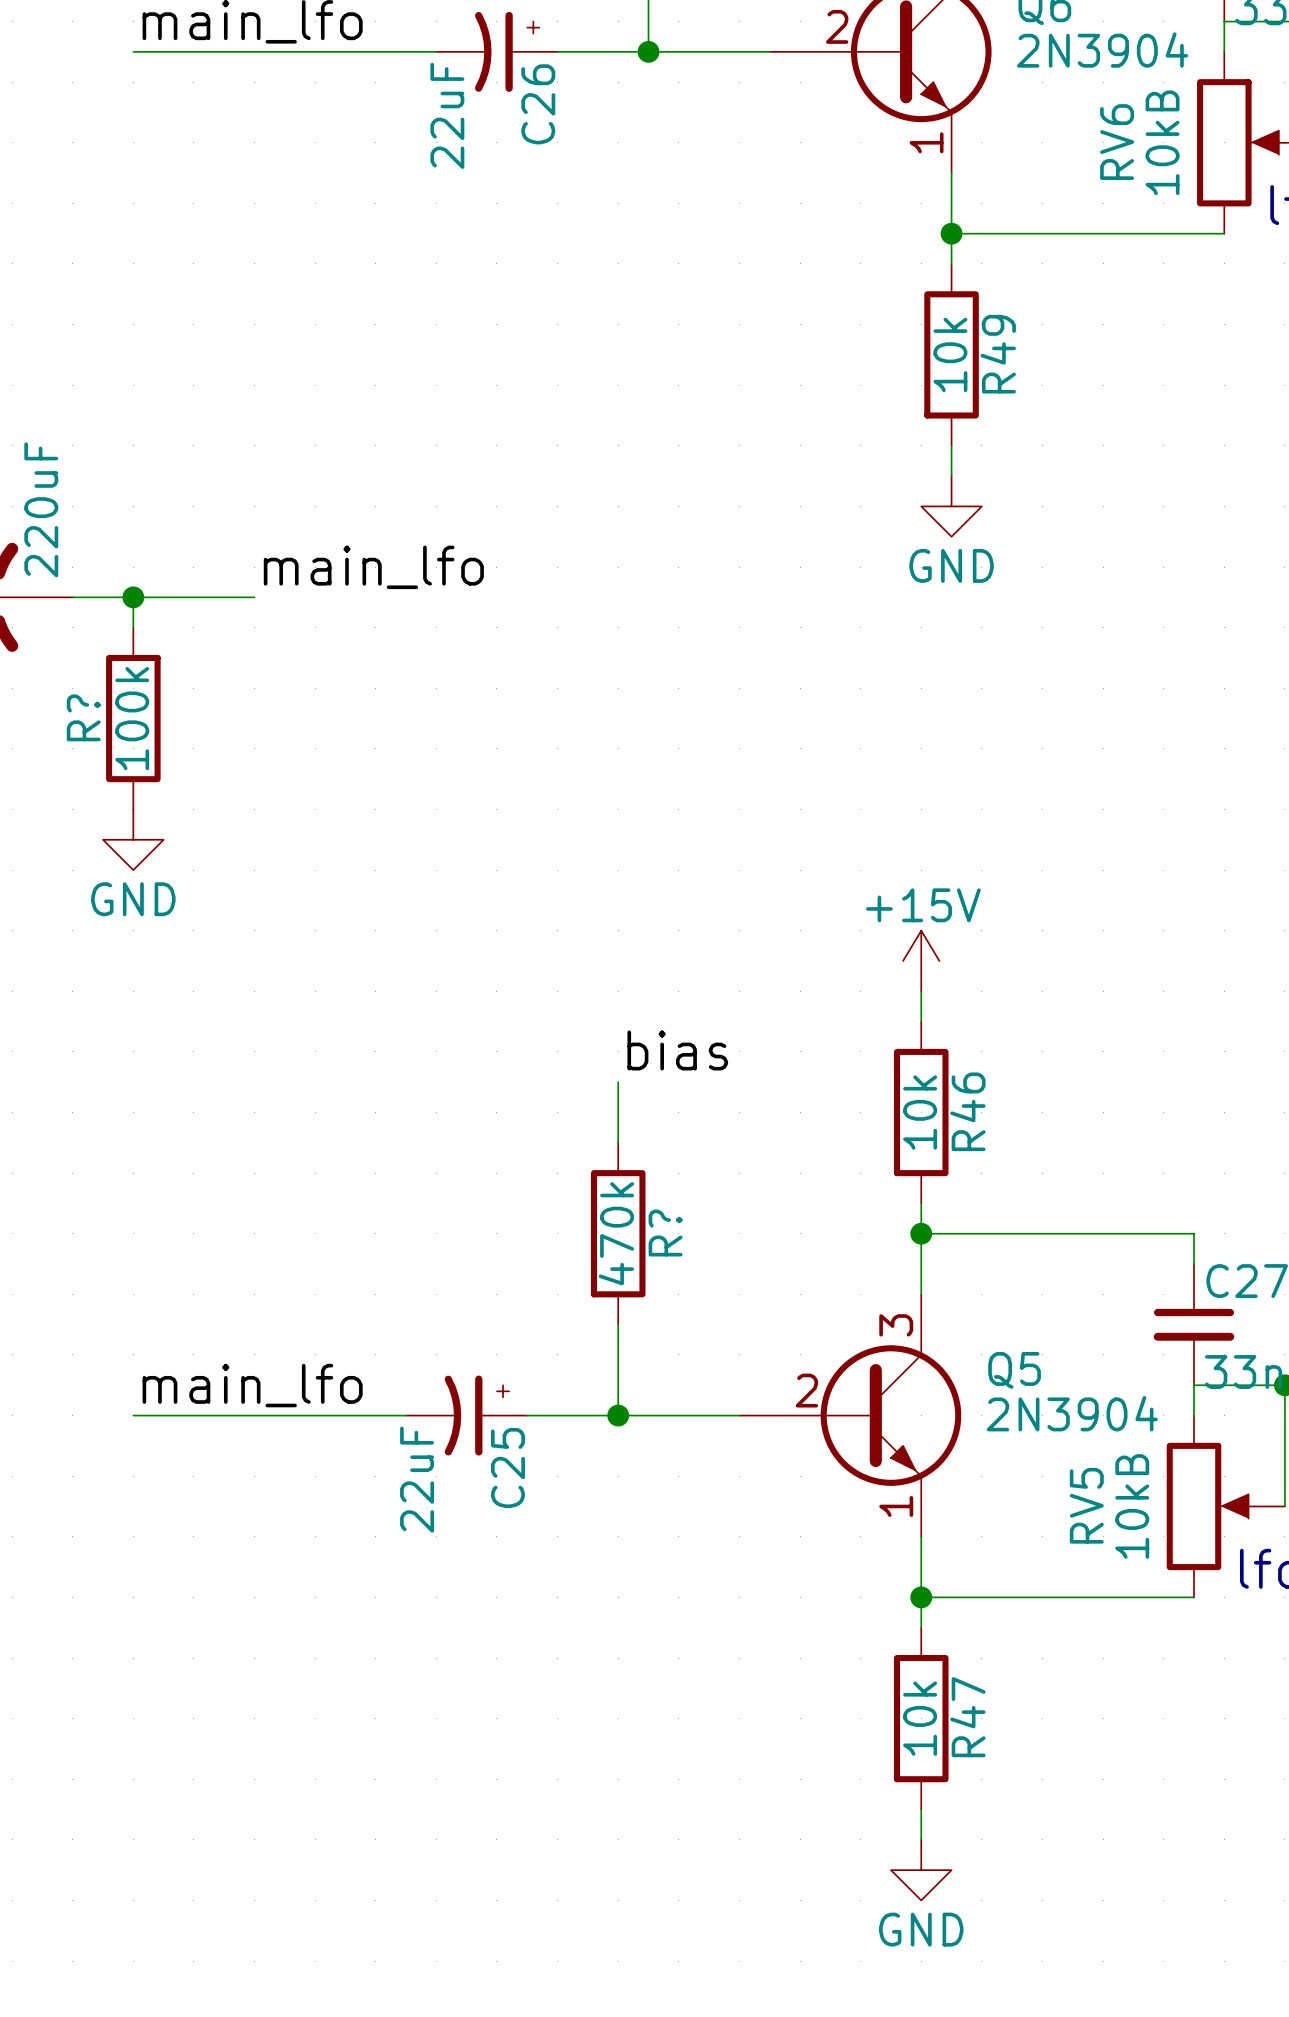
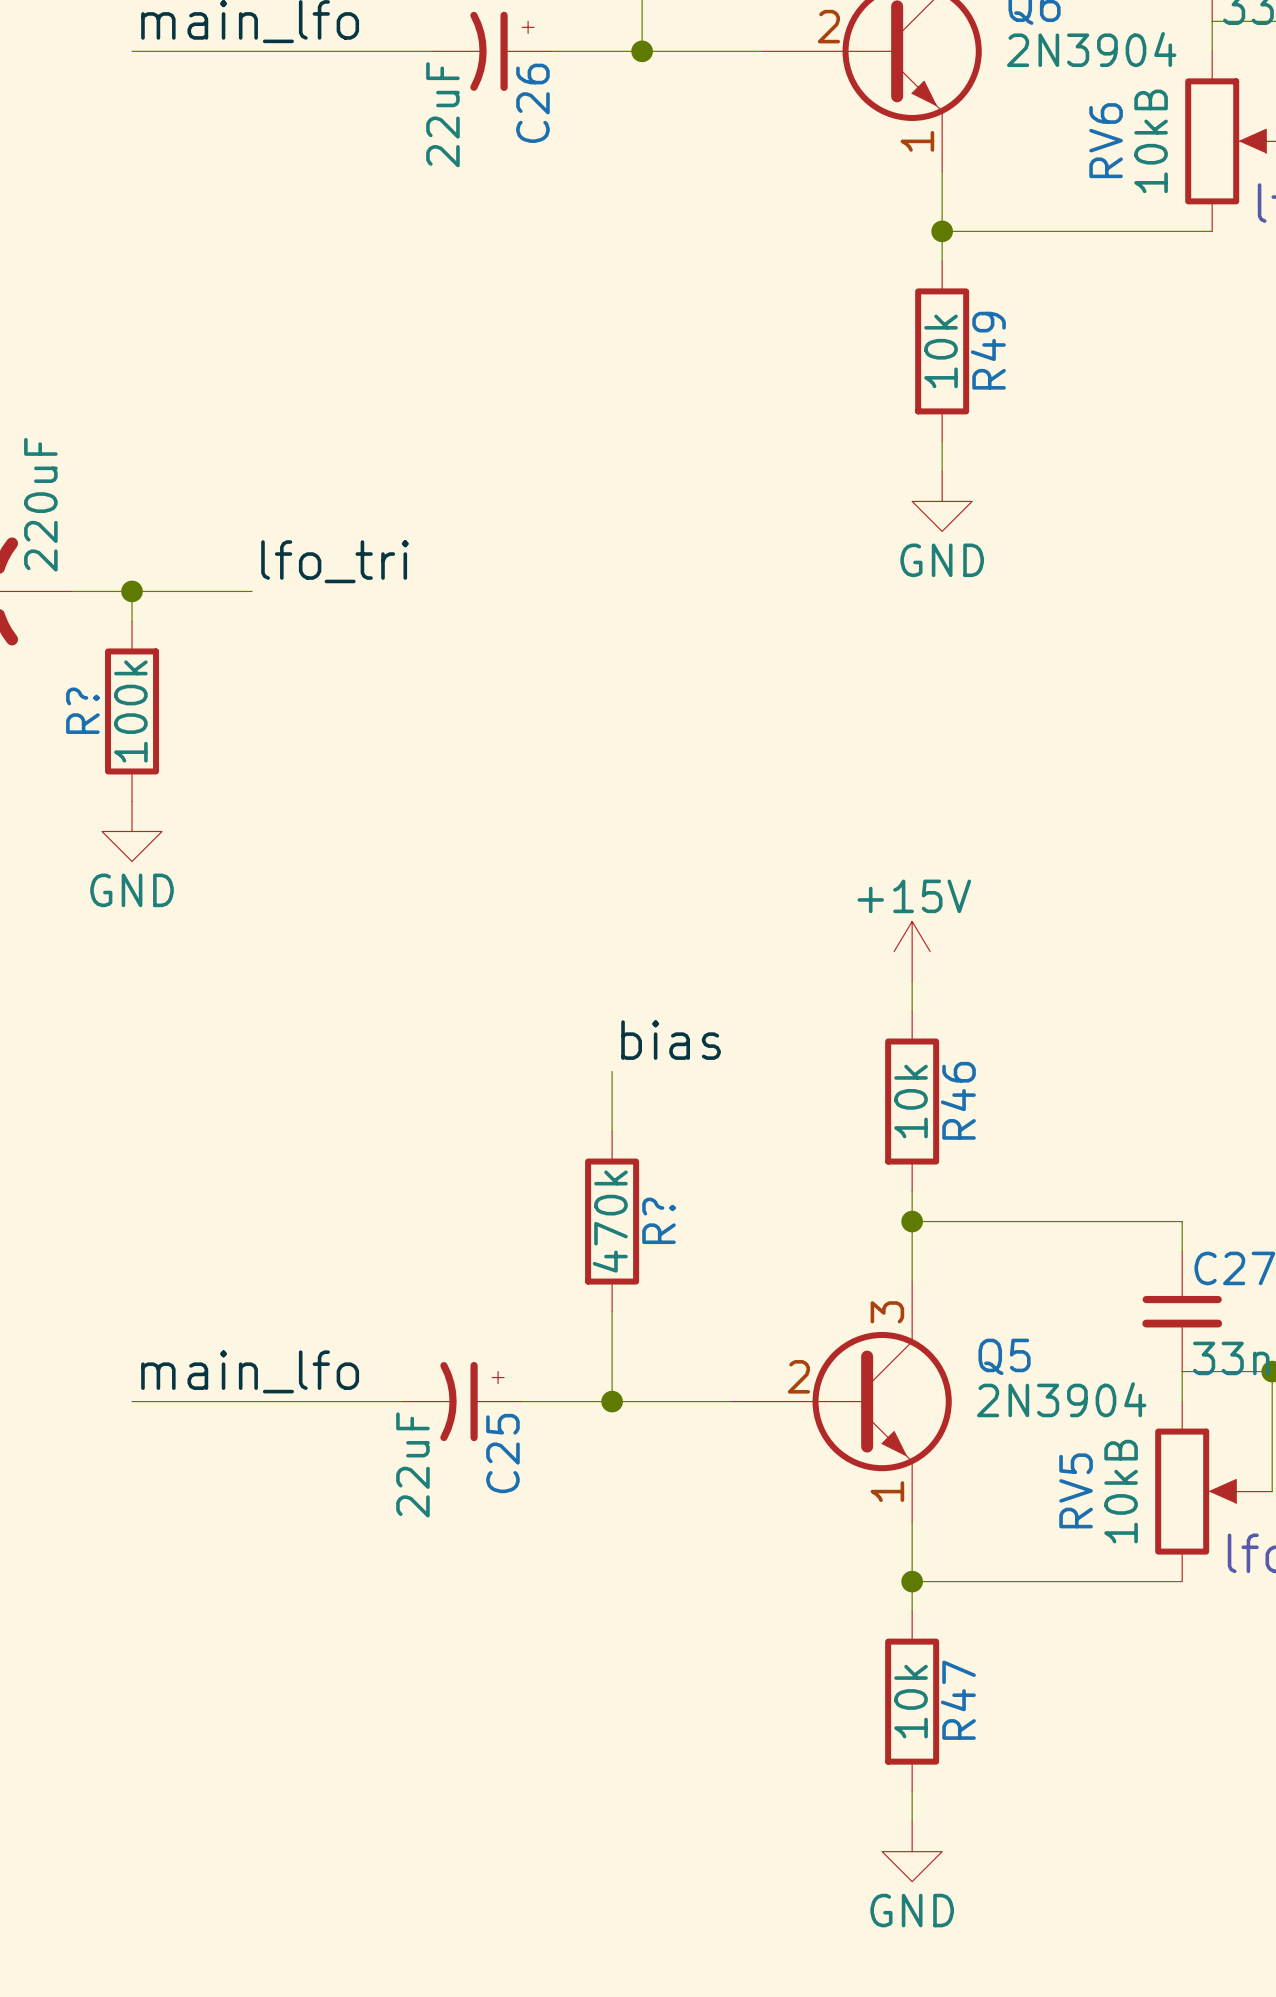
label: main_lfo (373, 567) -> lfo_tri (334, 561)

